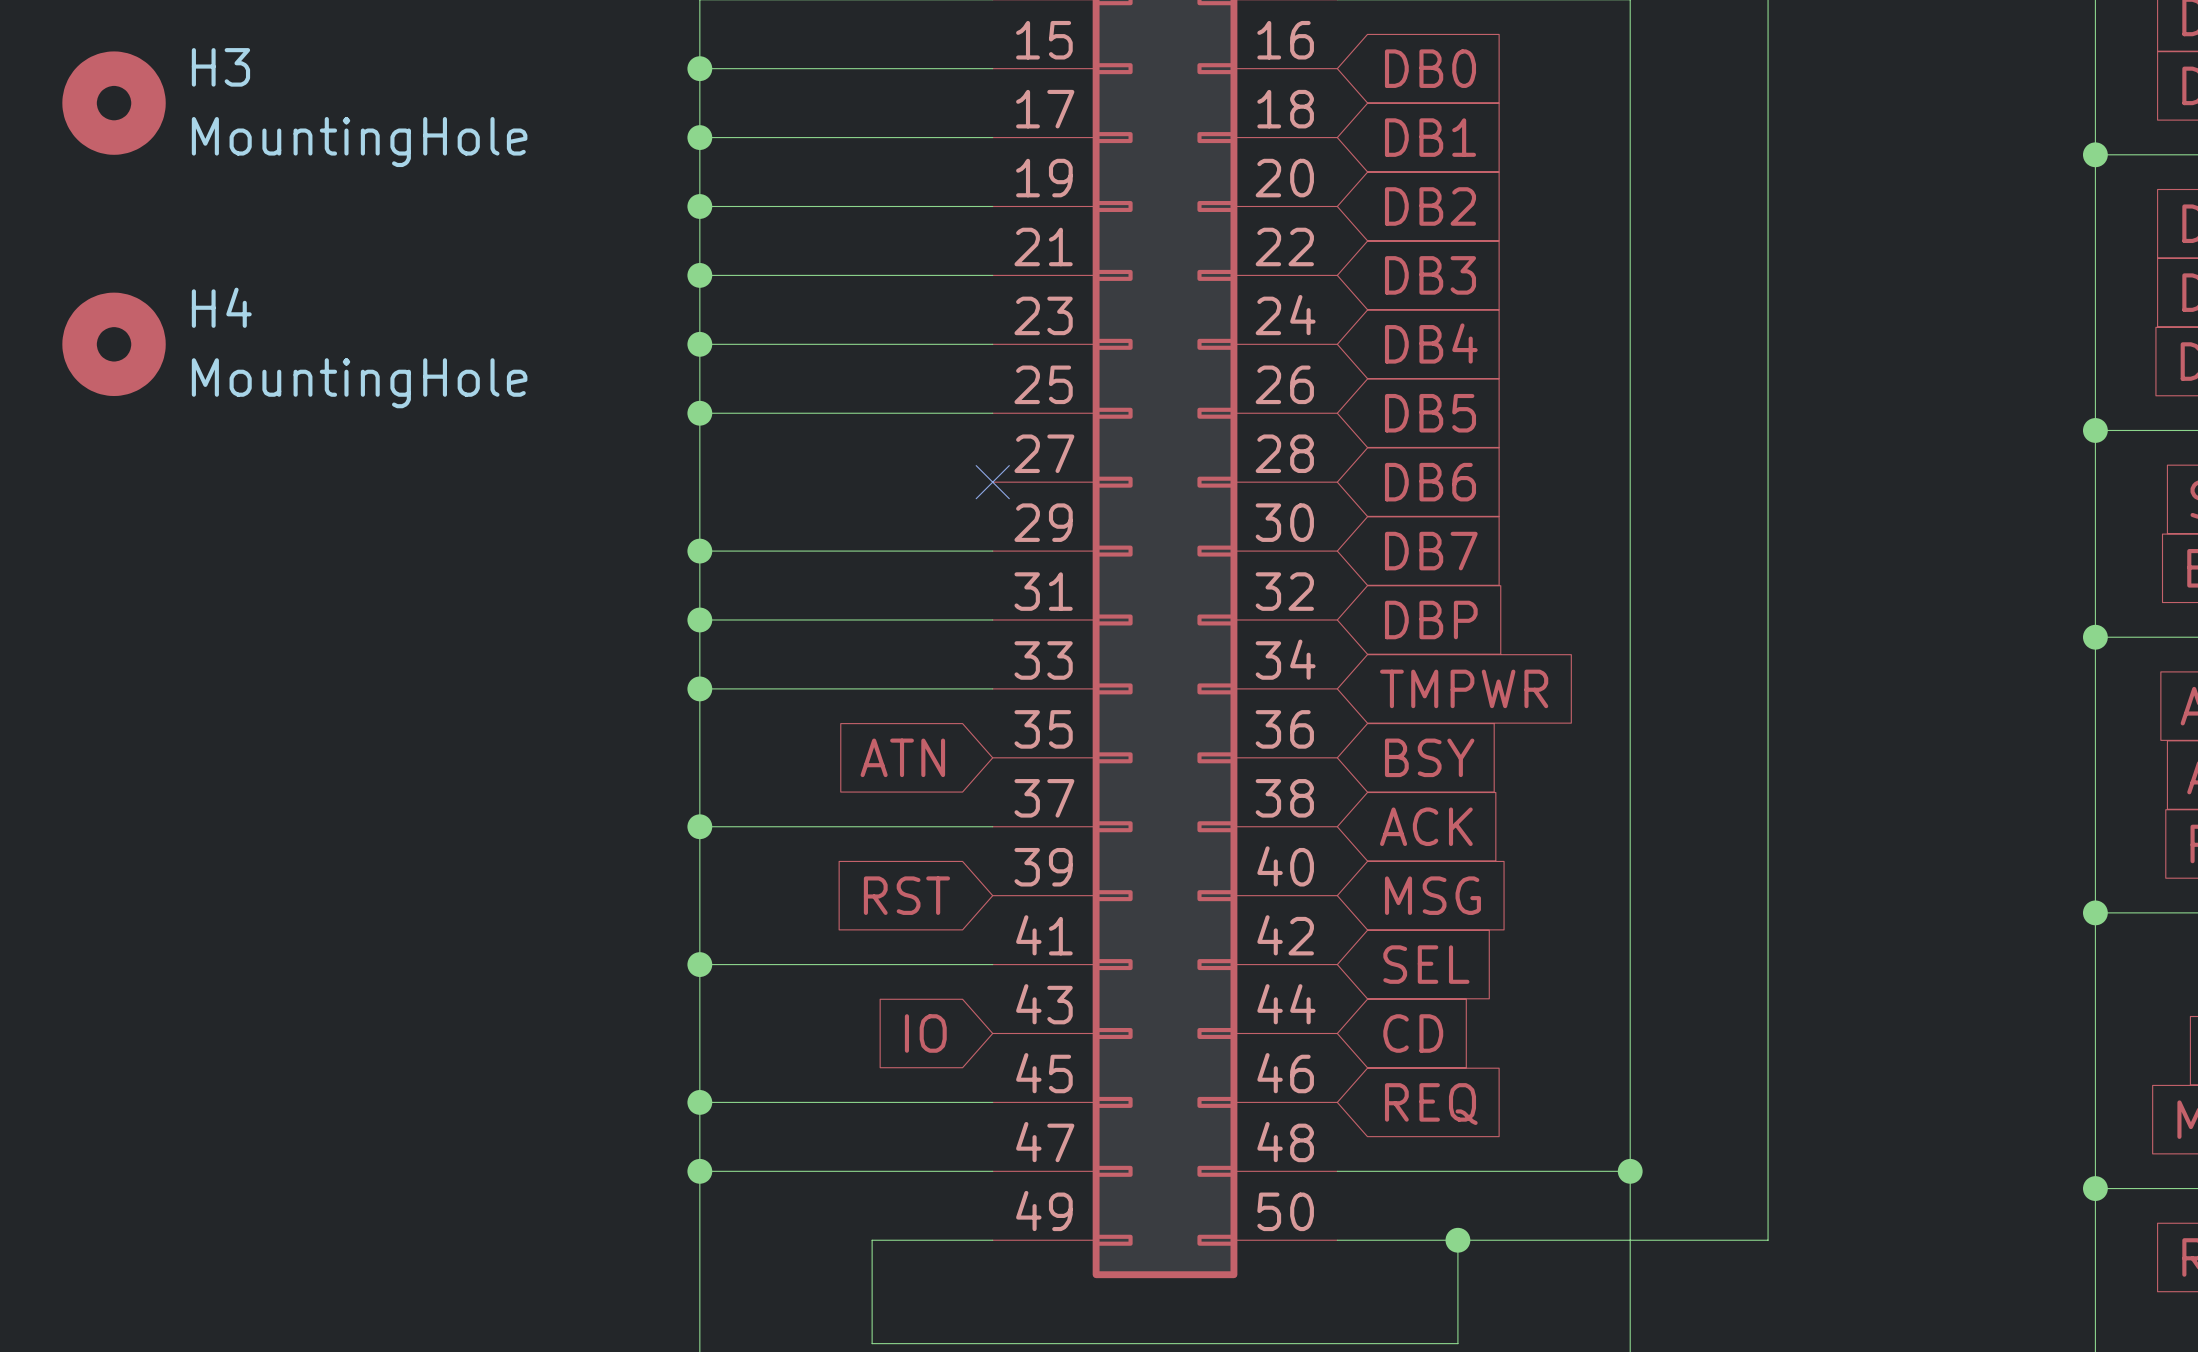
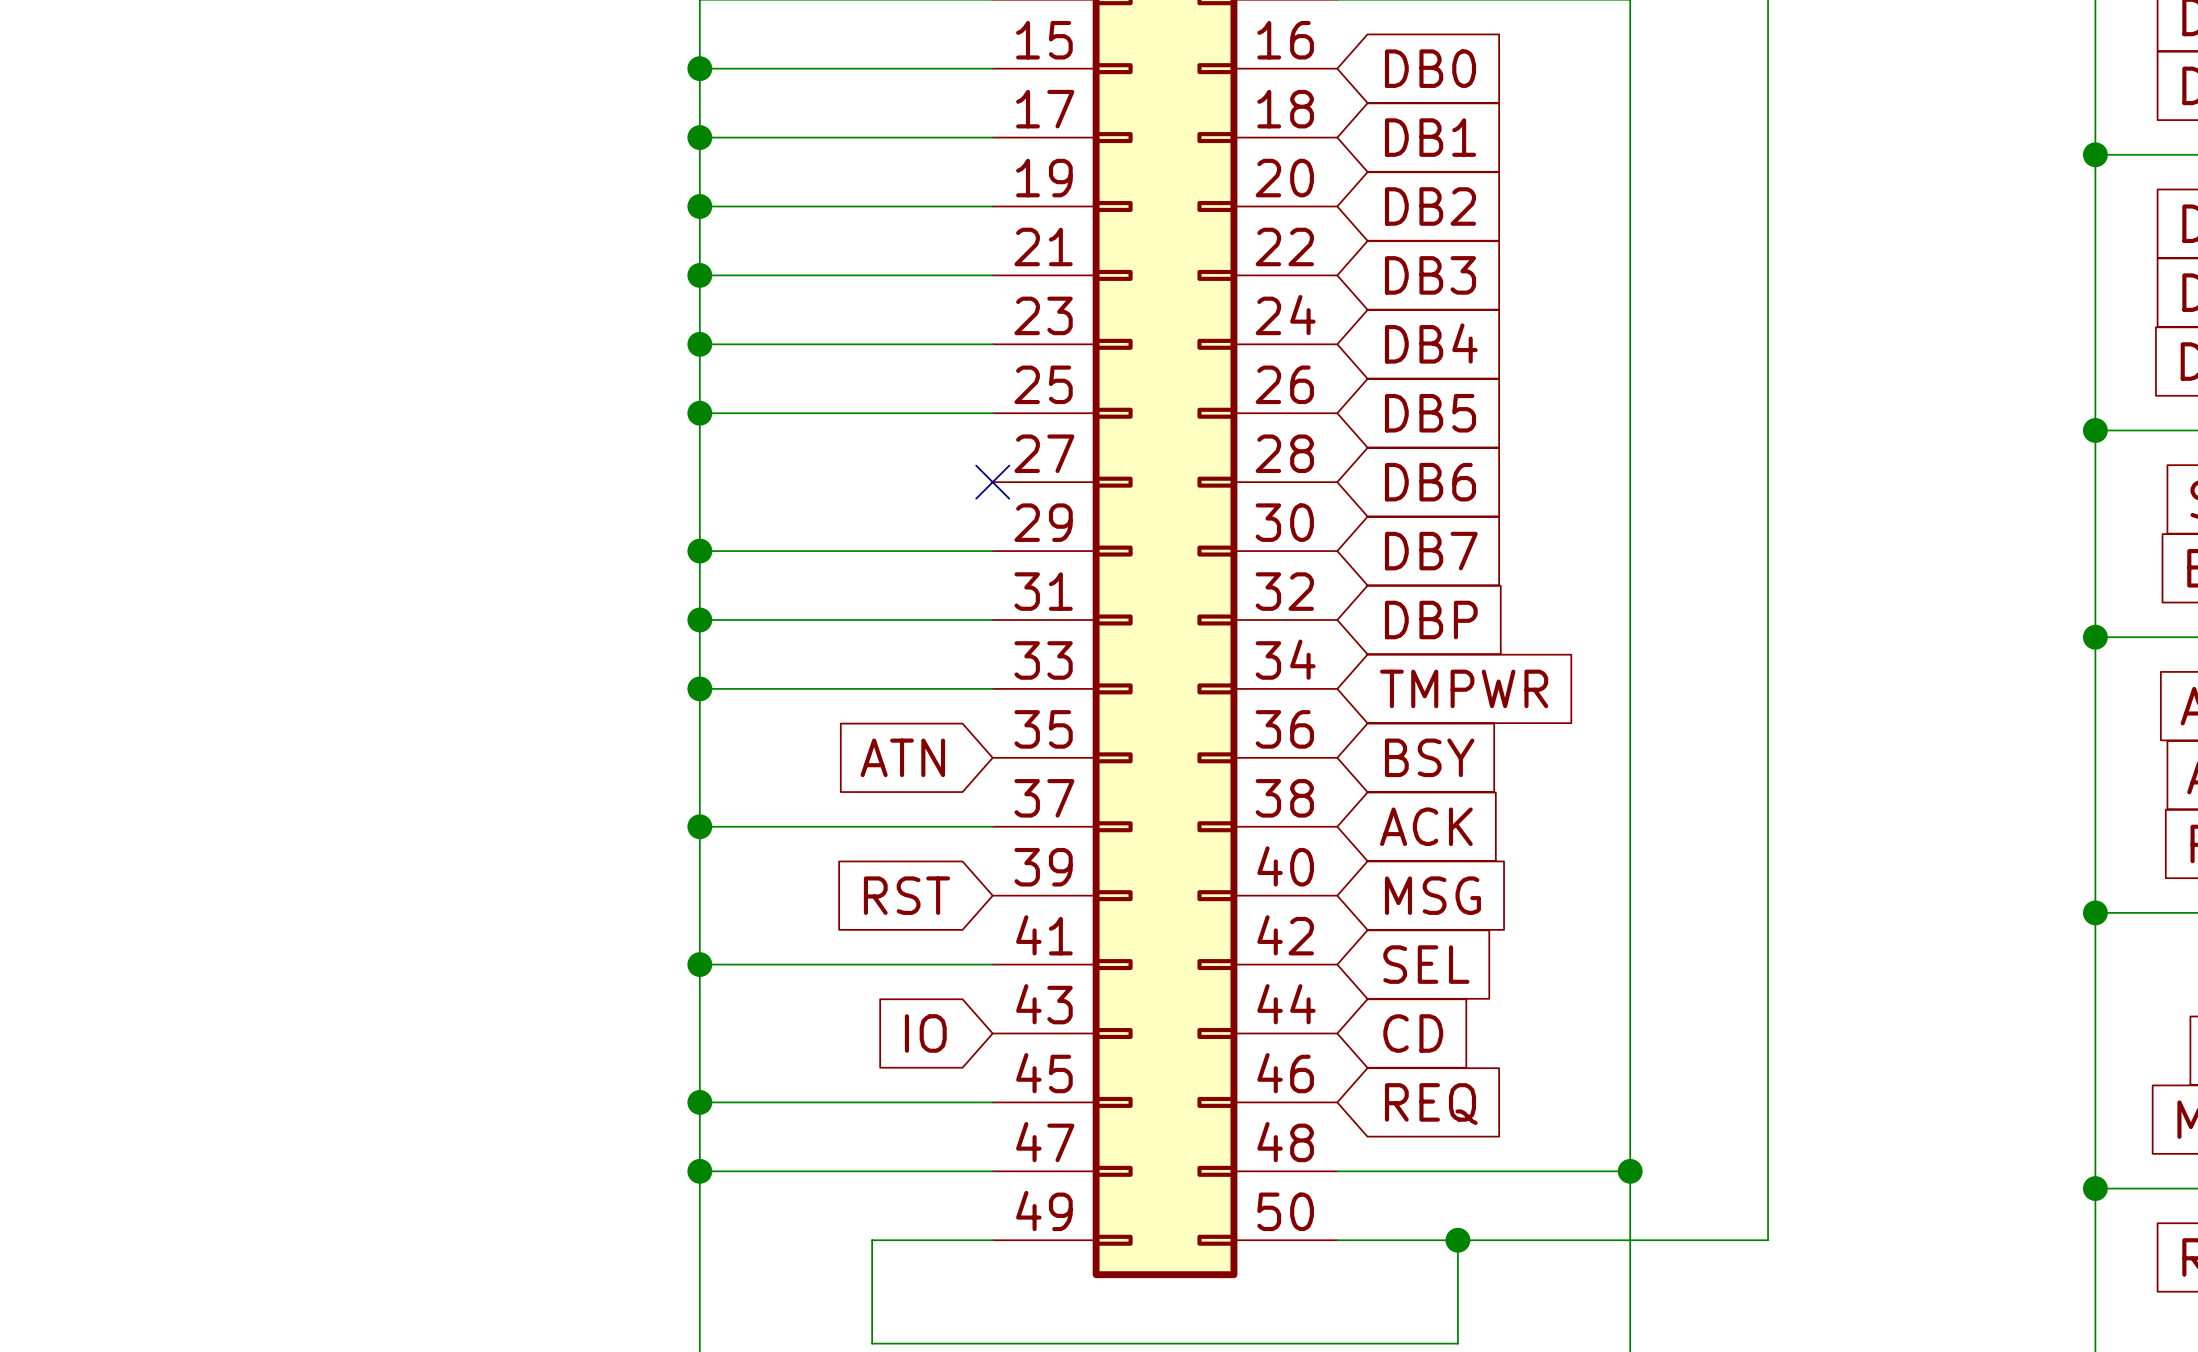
H3: MountingHole (114, 103) -> none
H4: MountingHole (114, 344) -> none

